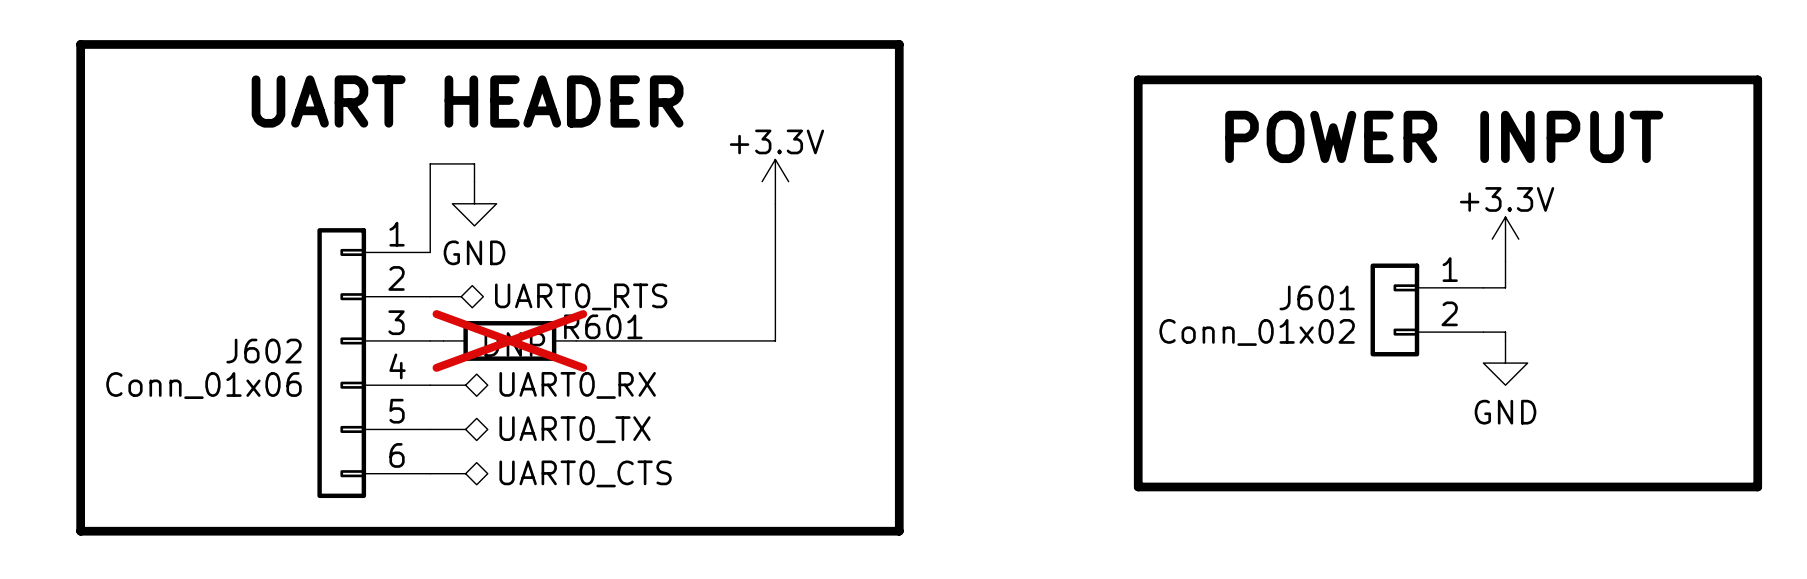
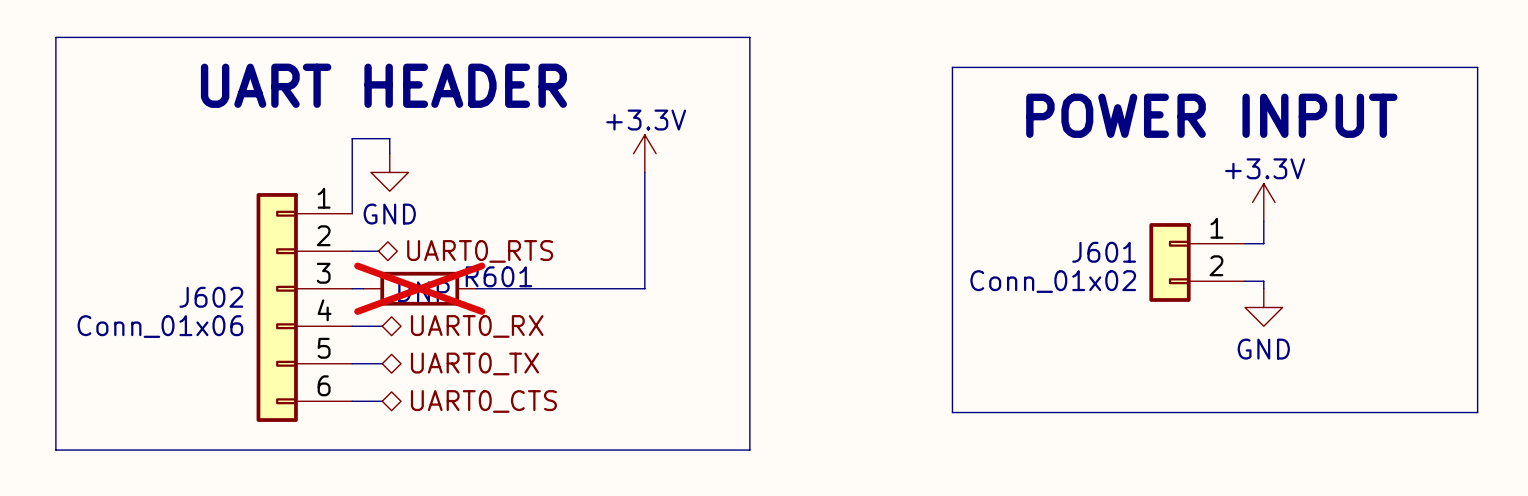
line width: thick (80, 44) (899, 44) (899, 531) (80, 531) (80, 44) -> thin (55, 37) (749, 37) (749, 450) (55, 450) (55, 37)
line width: thick (1138, 79) (1757, 79) (1757, 486) (1138, 486) (1138, 79) -> thin (952, 67) (1477, 67) (1477, 412) (952, 412) (952, 67)

